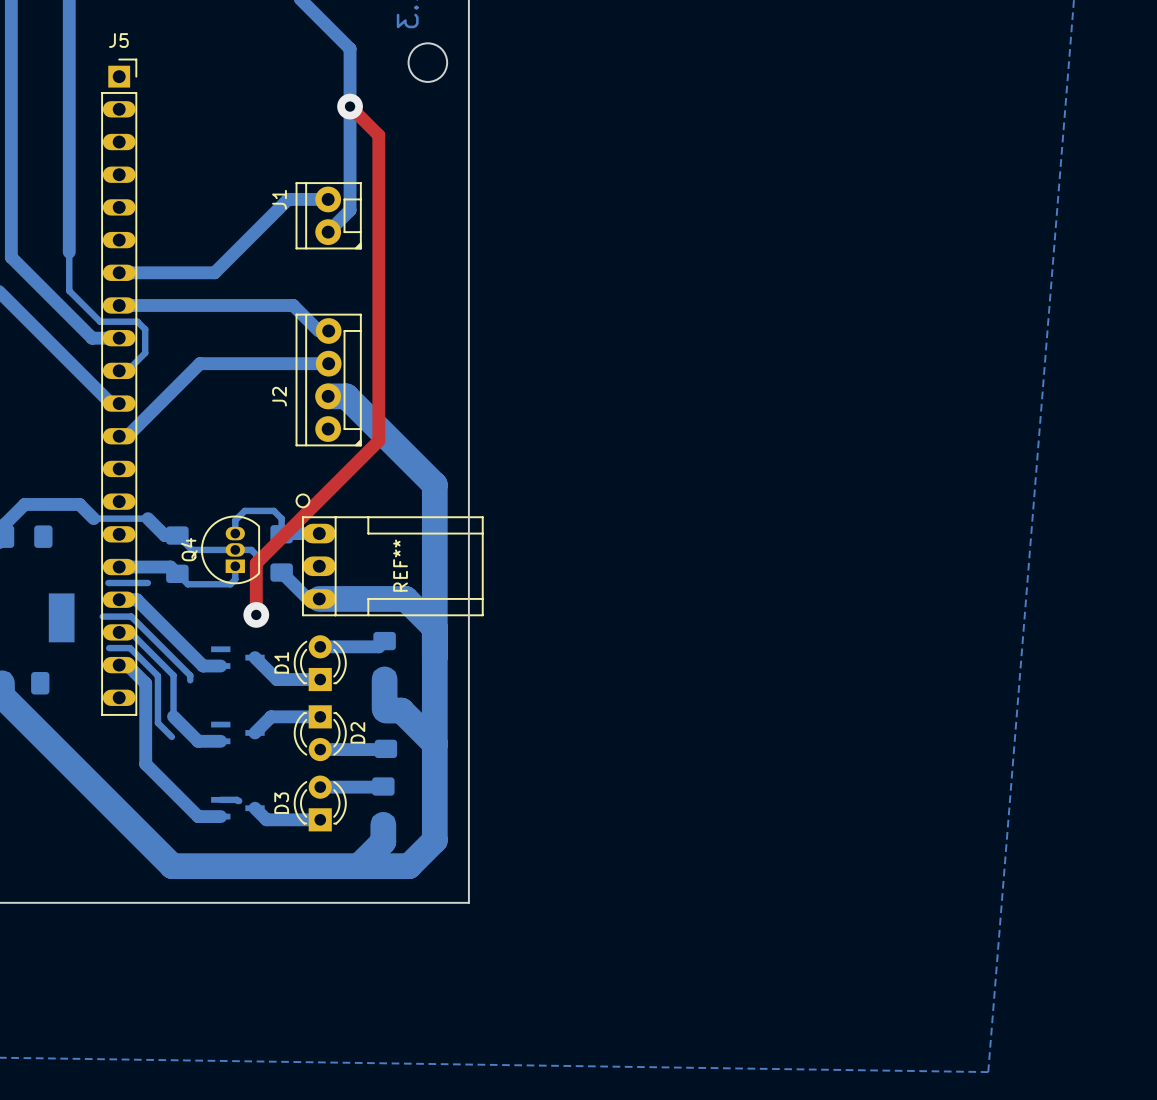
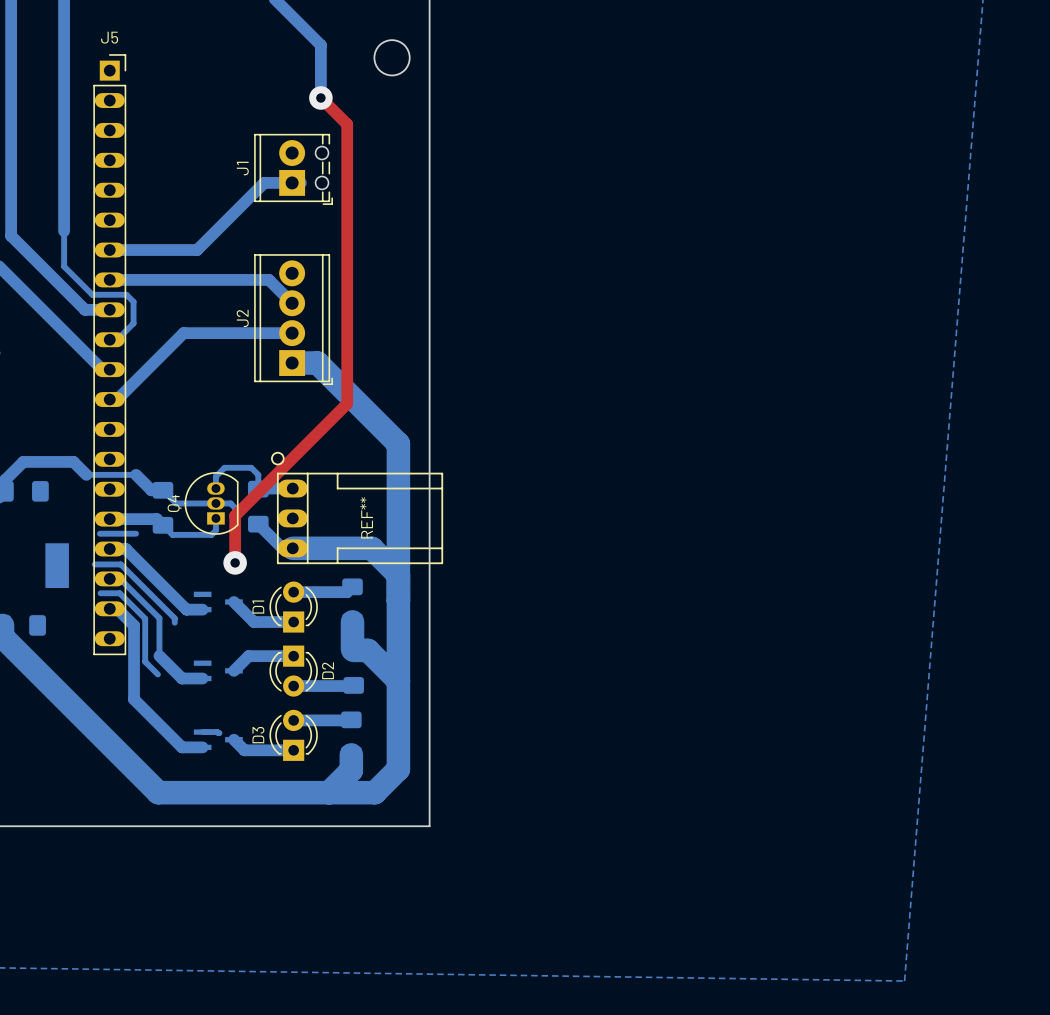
bottom track: (350, 106) (350, 210) (328, 232) -> none
J1 footprint: [295, 182, 362, 250] -> [254, 133, 333, 205]
J2 footprint: [295, 313, 362, 447] -> [254, 254, 333, 385]

